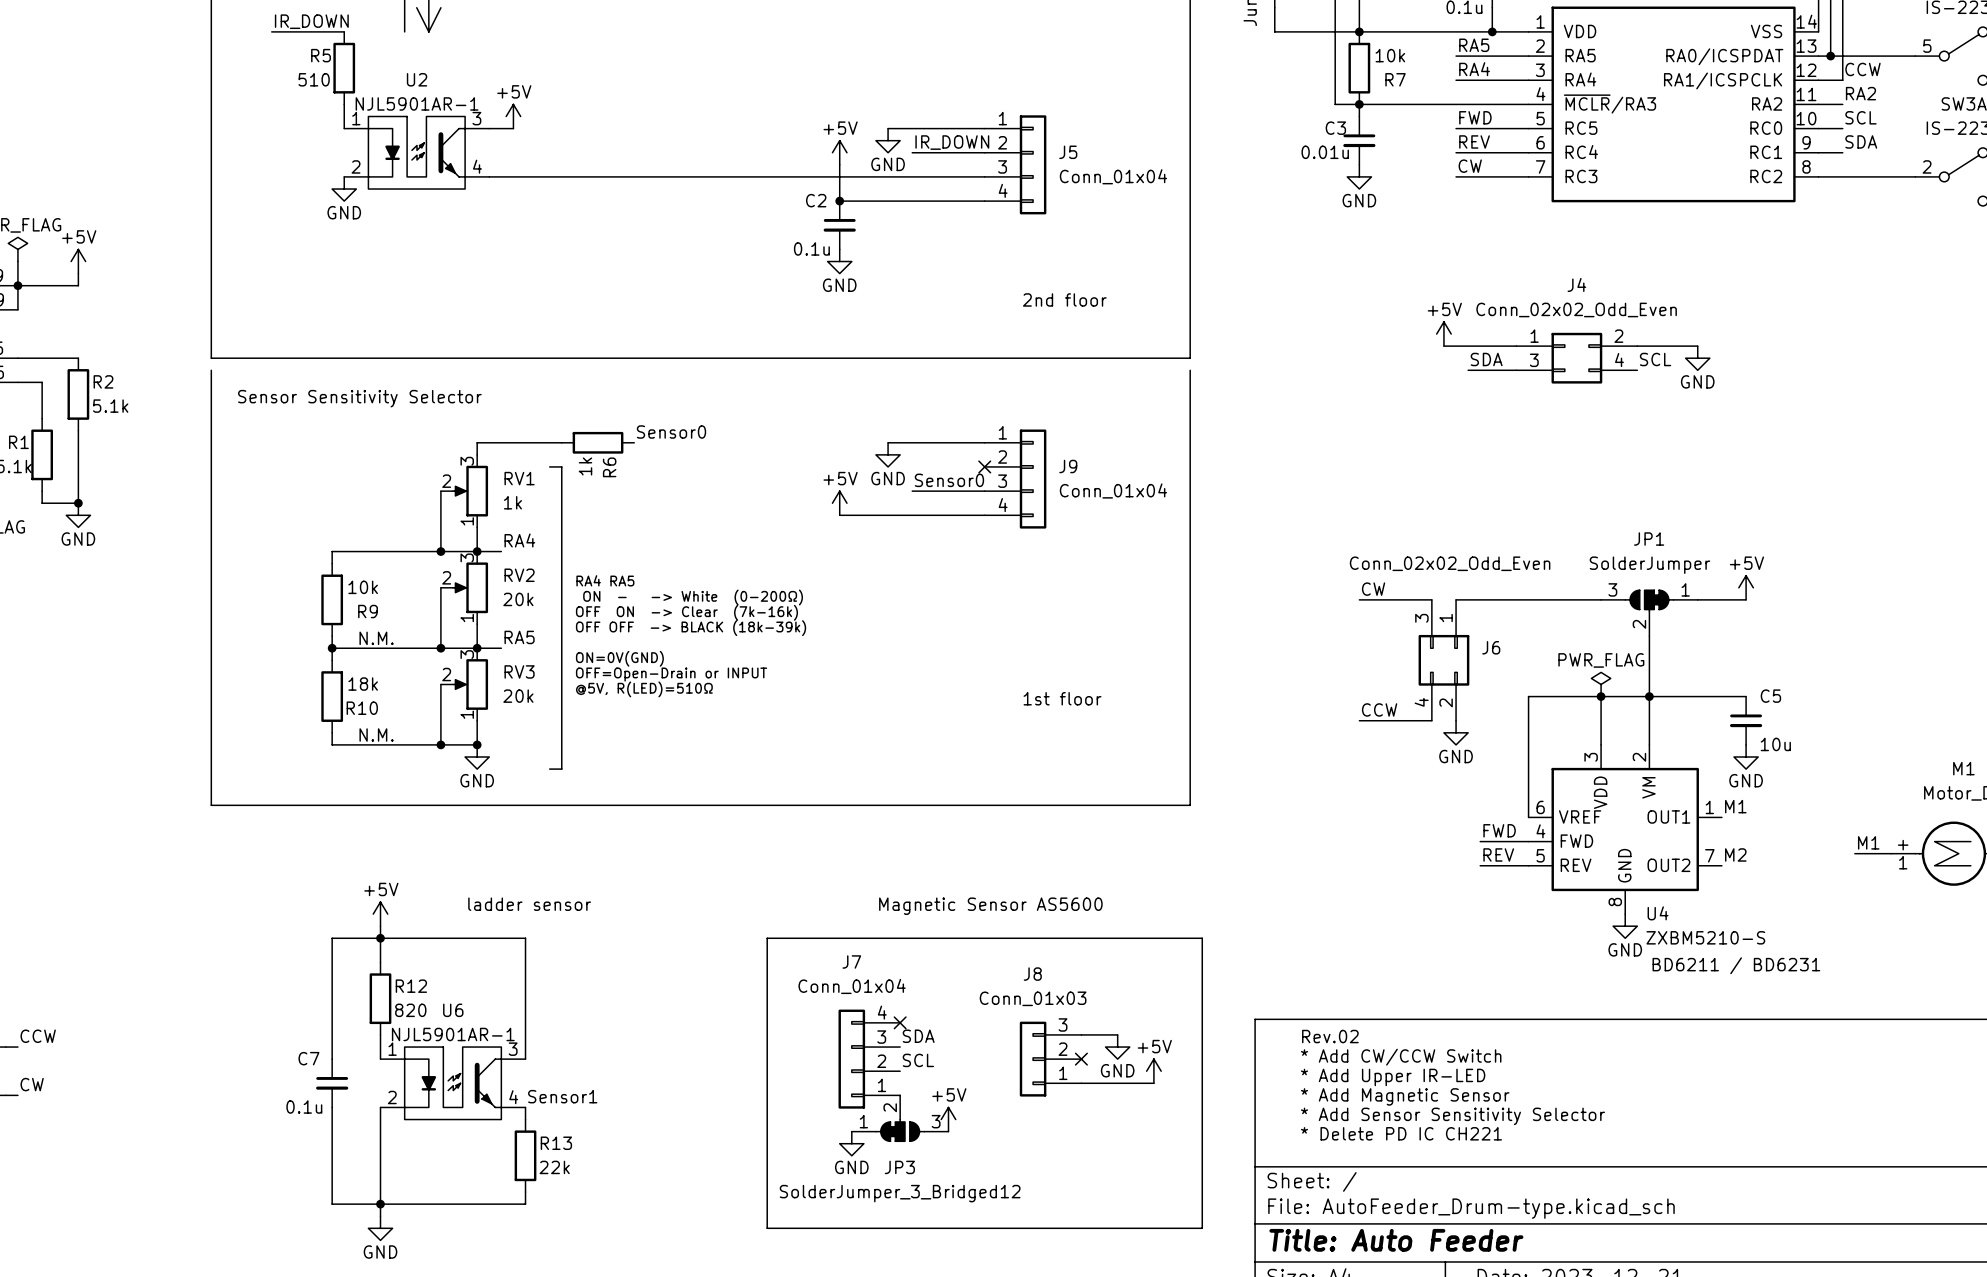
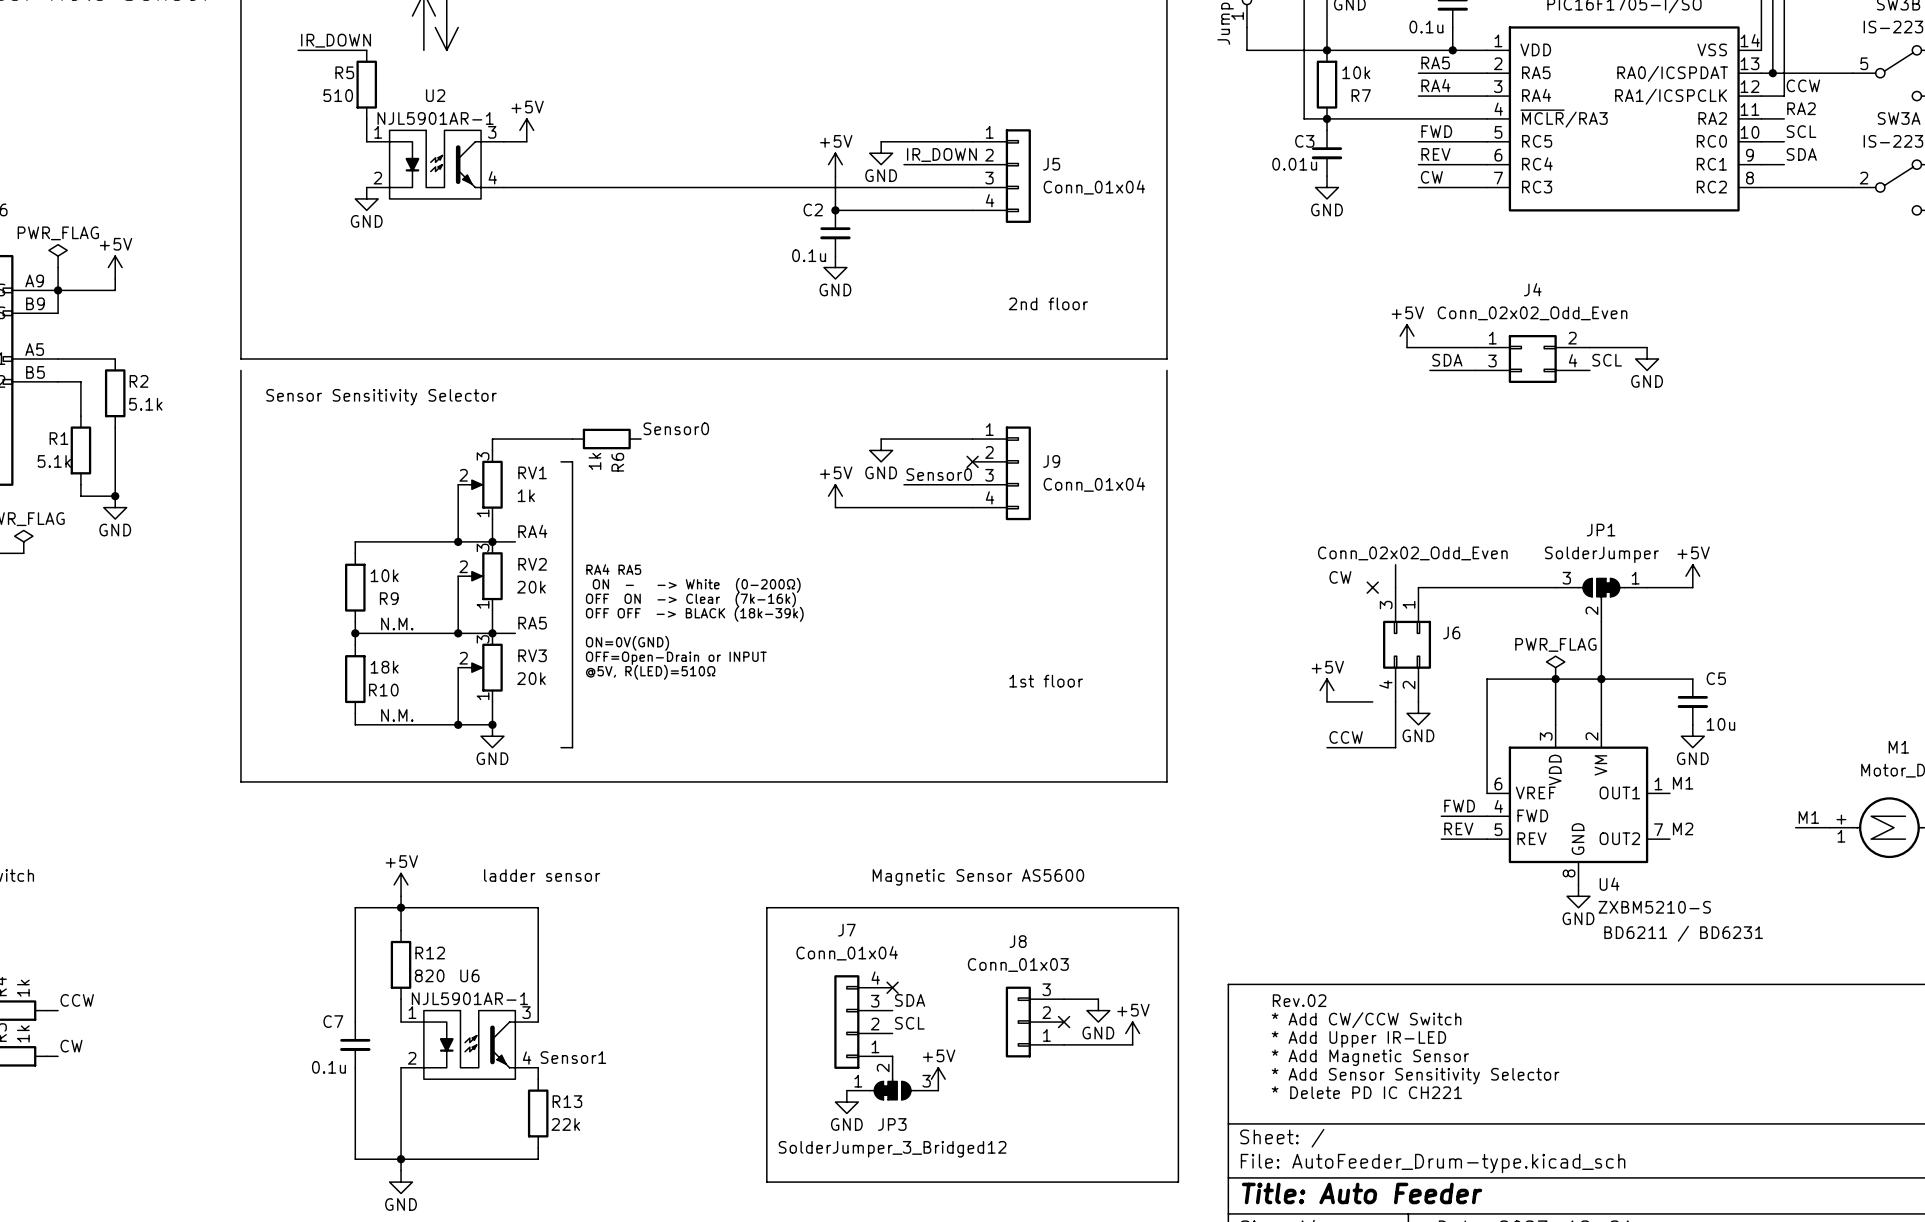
wire: (1359, 599) (1431, 599) -> (1395, 564) (1395, 587)
no-connect mark: none -> (1372, 587)
power symbol: none -> +5V (1327, 690)
label position: CCW (1379, 709) -> CCW (1346, 737)
wire: (1407, 720) (1431, 720) -> (1327, 747) (1395, 747) (1395, 701)

